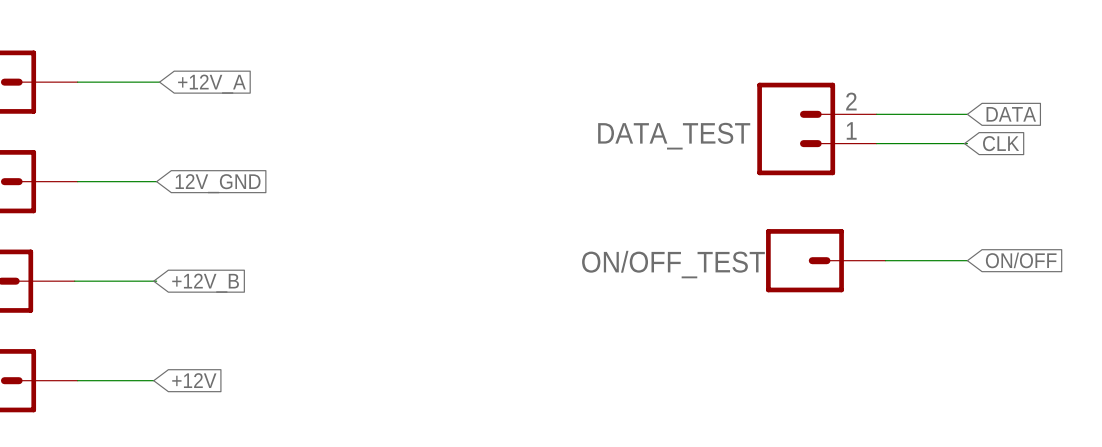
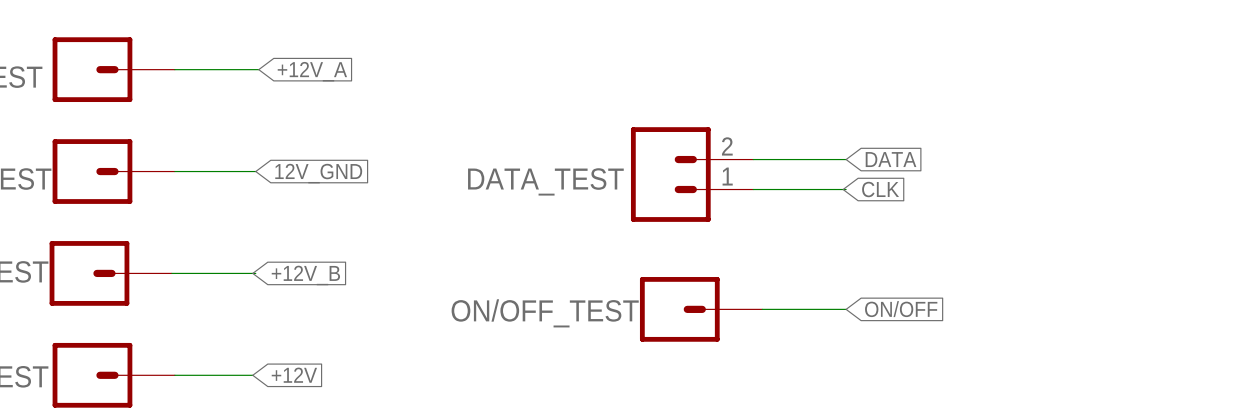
wire: (876, 114) (967, 114) -> (753, 189) (846, 189)
global label position: DATA (1011, 114) -> DATA (891, 159)
DATA_TEST position: (816, 128) -> (692, 174)
wire: (876, 143) (967, 143) -> (753, 159) (846, 159)
global label position: CLK (1001, 143) -> CLK (880, 189)
ON/OFF_TEST position: (825, 260) -> (701, 309)
wire: (885, 260) (967, 260) -> (762, 309) (846, 309)
global label position: ON/OFF (1021, 260) -> ON/OFF (901, 309)

